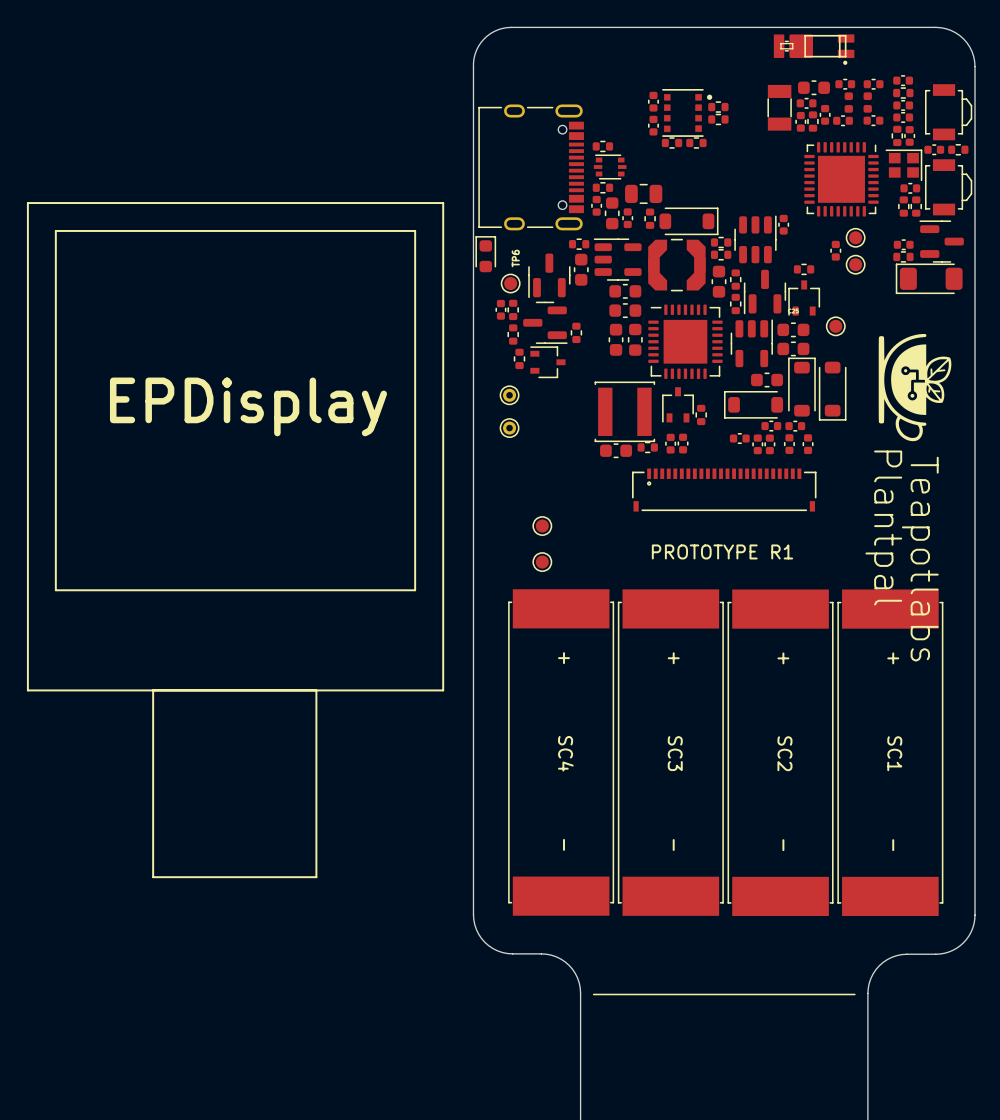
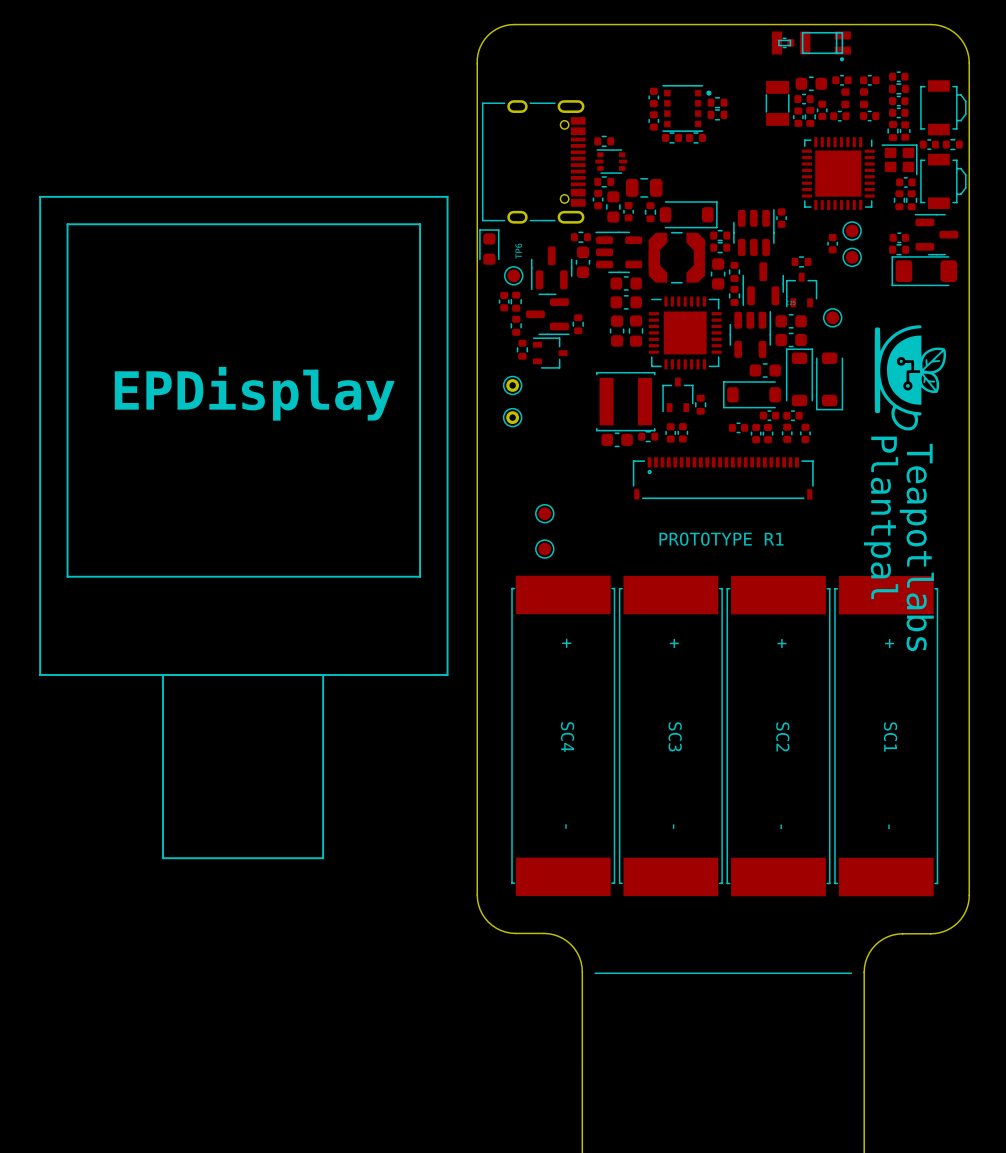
part footprint: [773, 34, 855, 65] -> [771, 31, 851, 62]

